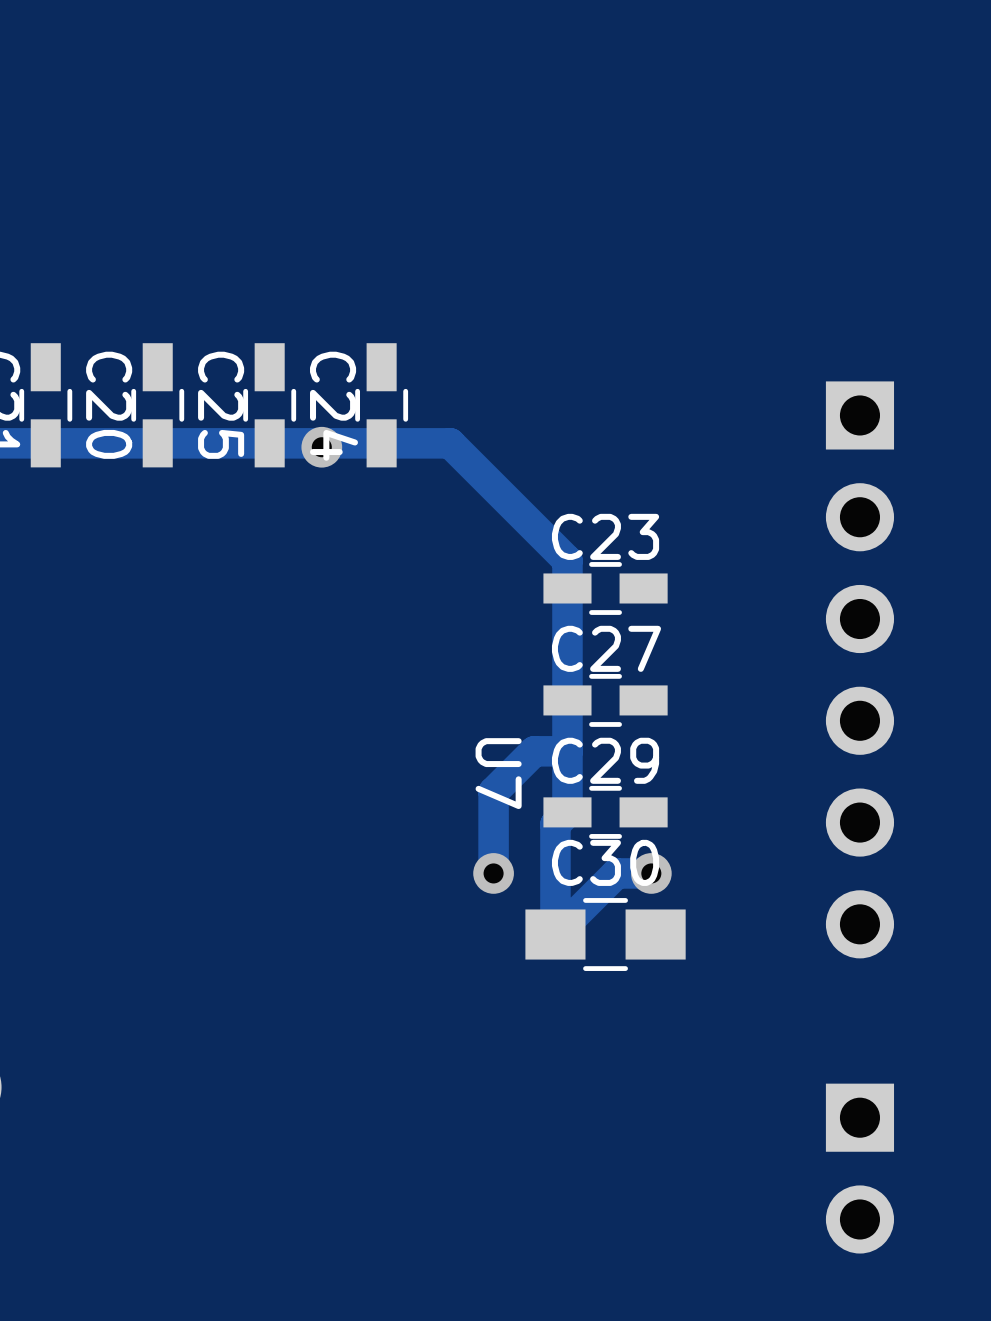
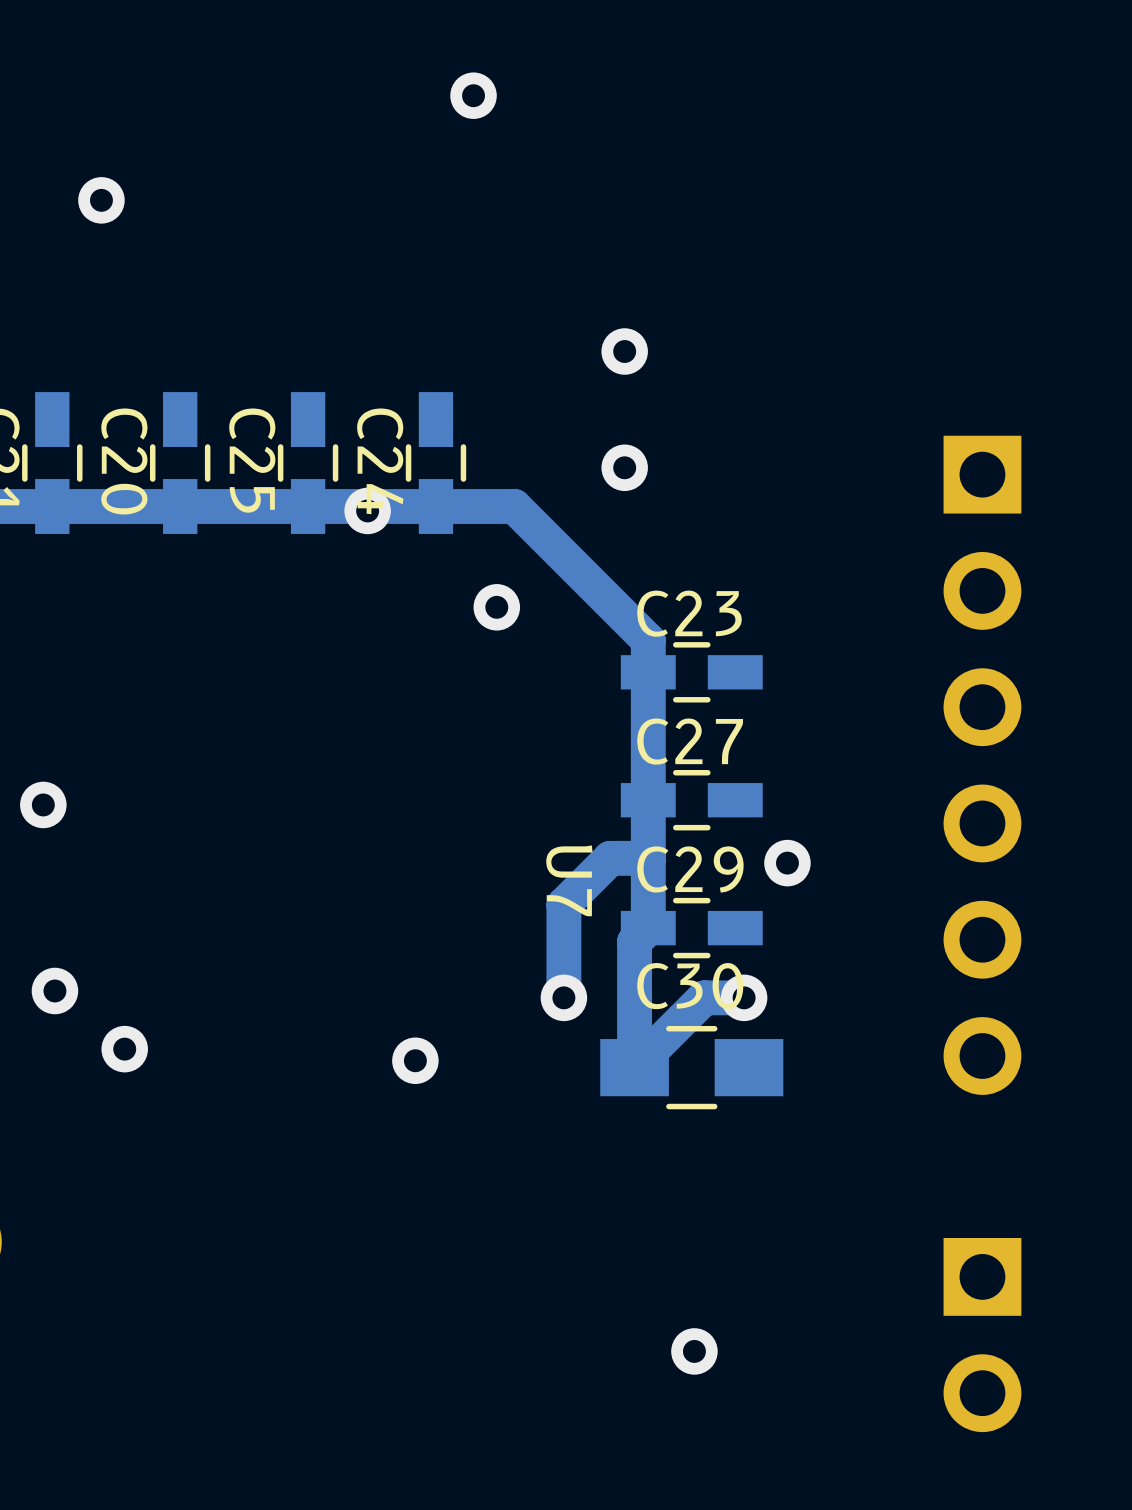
via: none -> (473, 95)
via: none -> (101, 200)
via: none -> (624, 351)
via: none -> (624, 467)
via: none -> (496, 607)
via: none -> (43, 804)
via: none -> (787, 863)
via: none -> (54, 990)
via: none -> (124, 1049)
via: none -> (415, 1060)
via: none -> (694, 1351)

